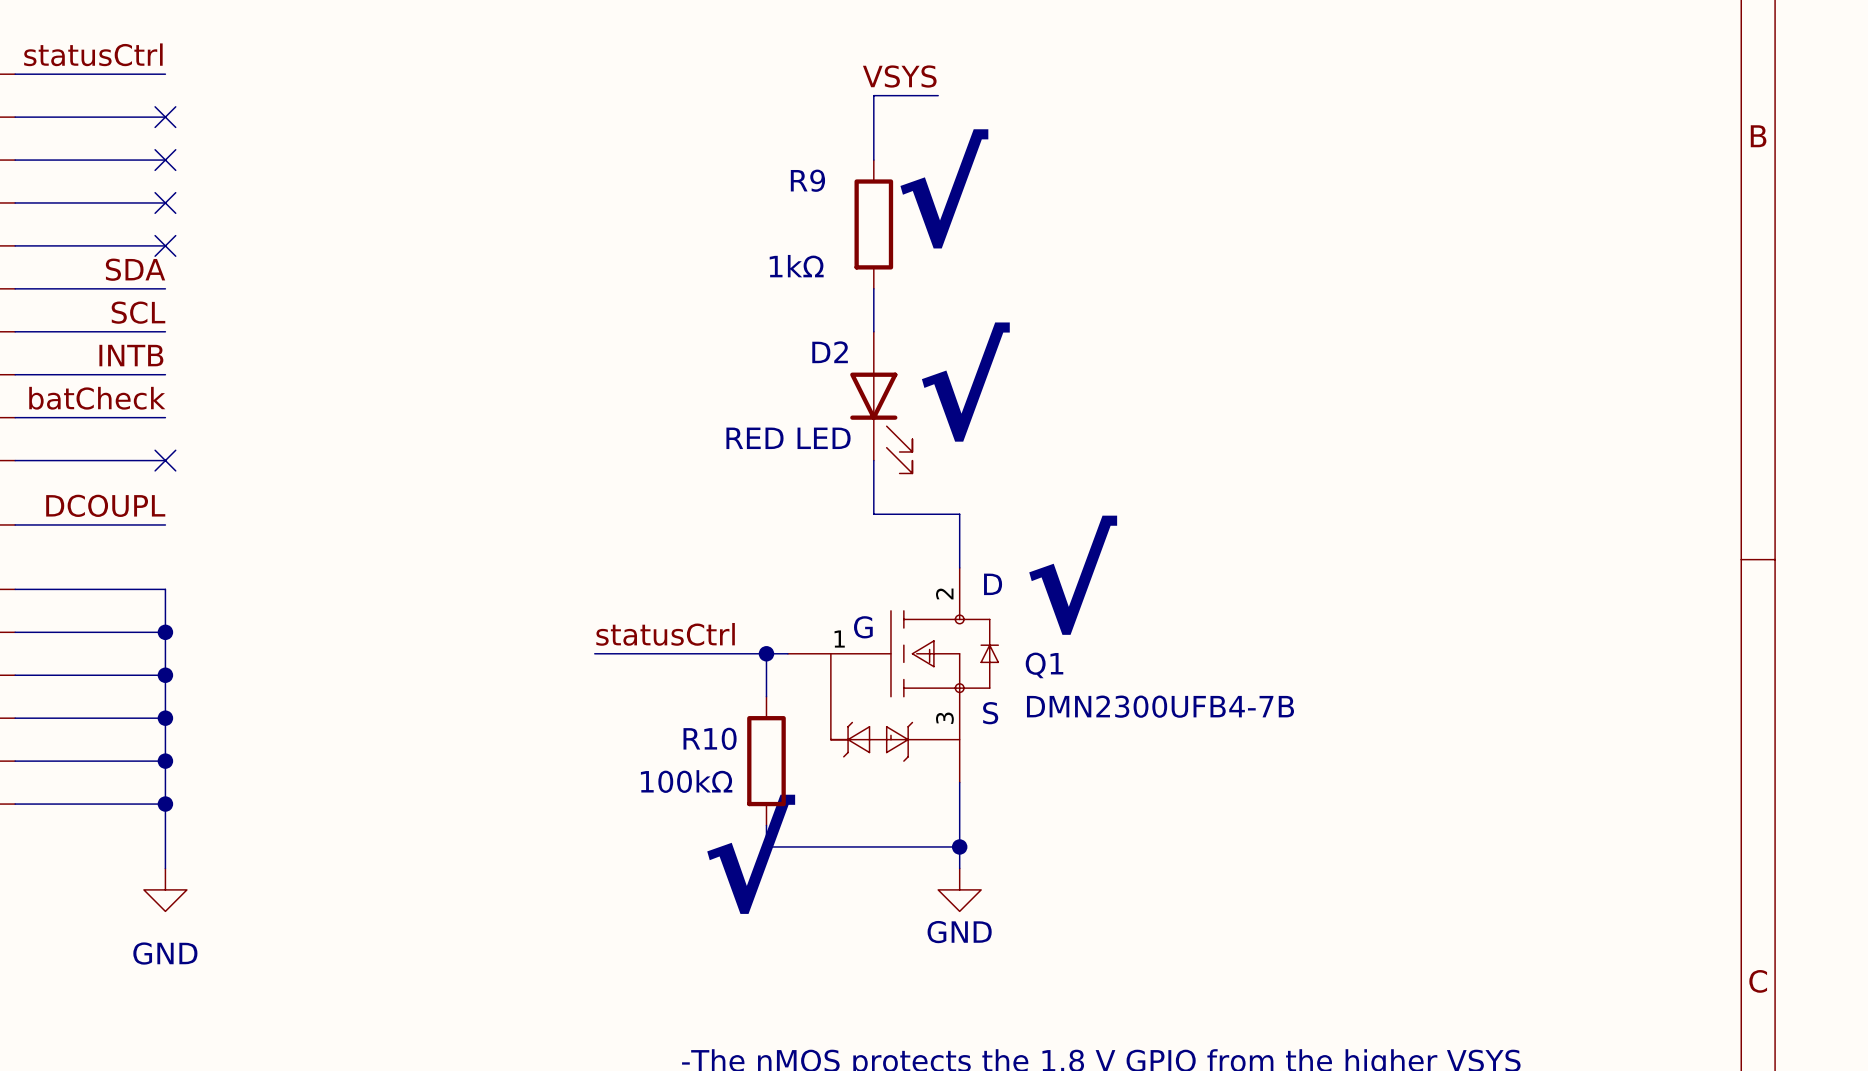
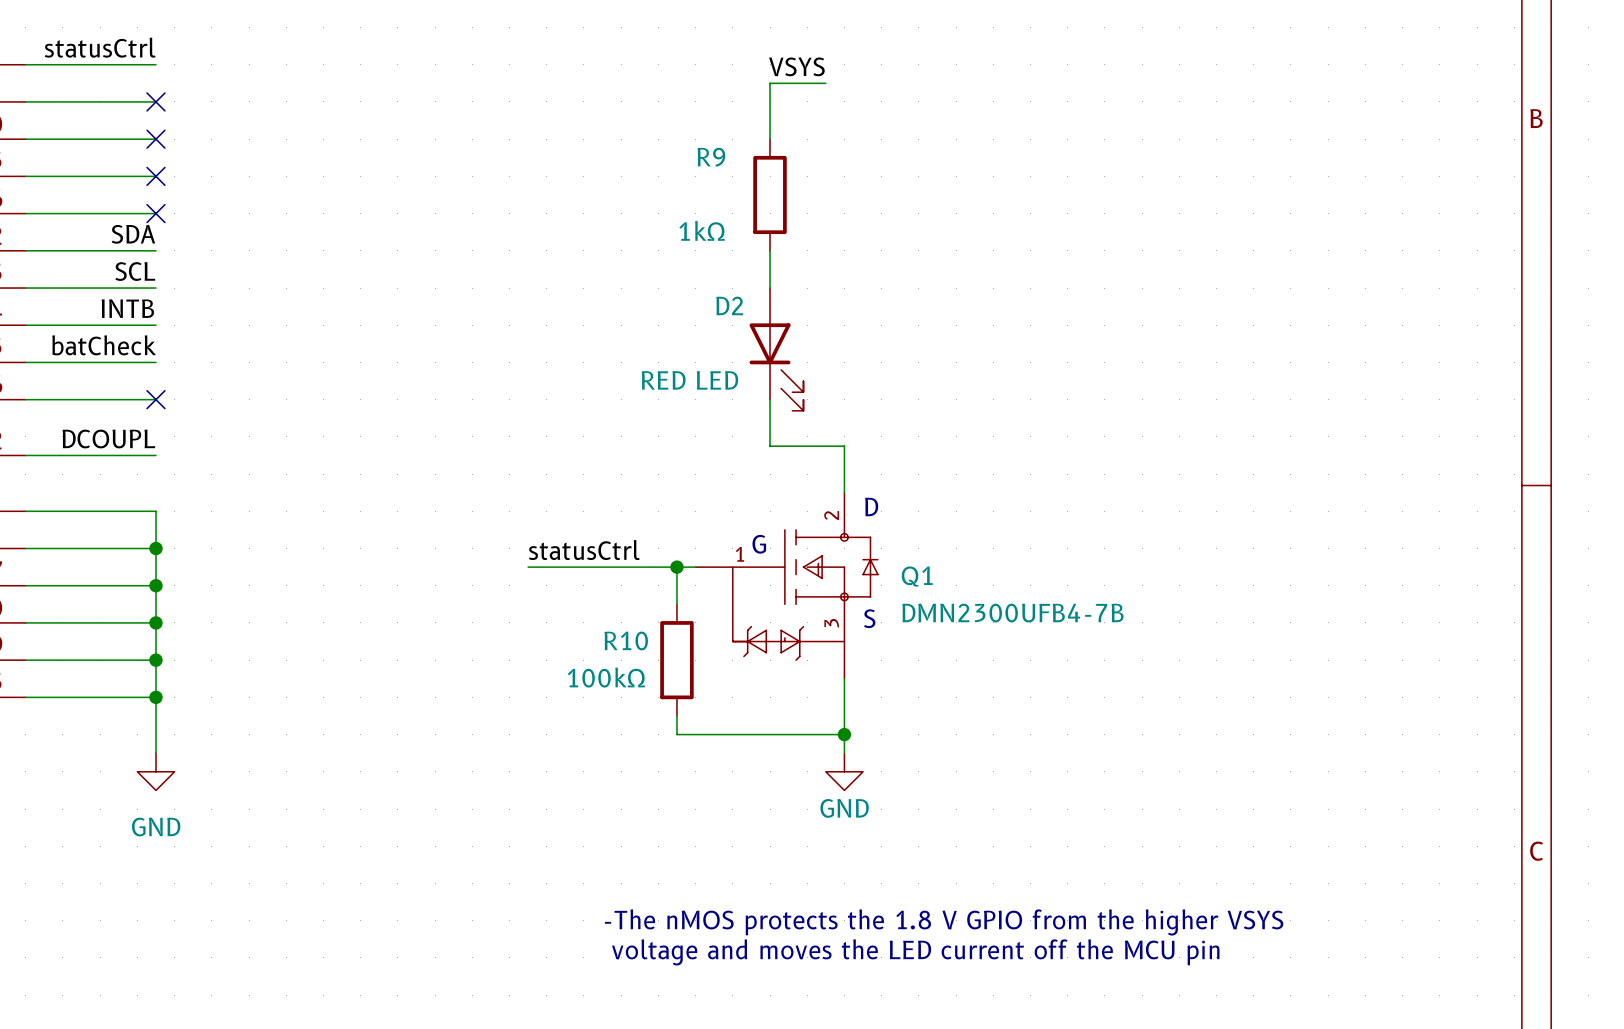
text: √ (944, 188) -> none
text: √ (965, 382) -> none
text: √ (1073, 575) -> none
text: √ (751, 854) -> none

